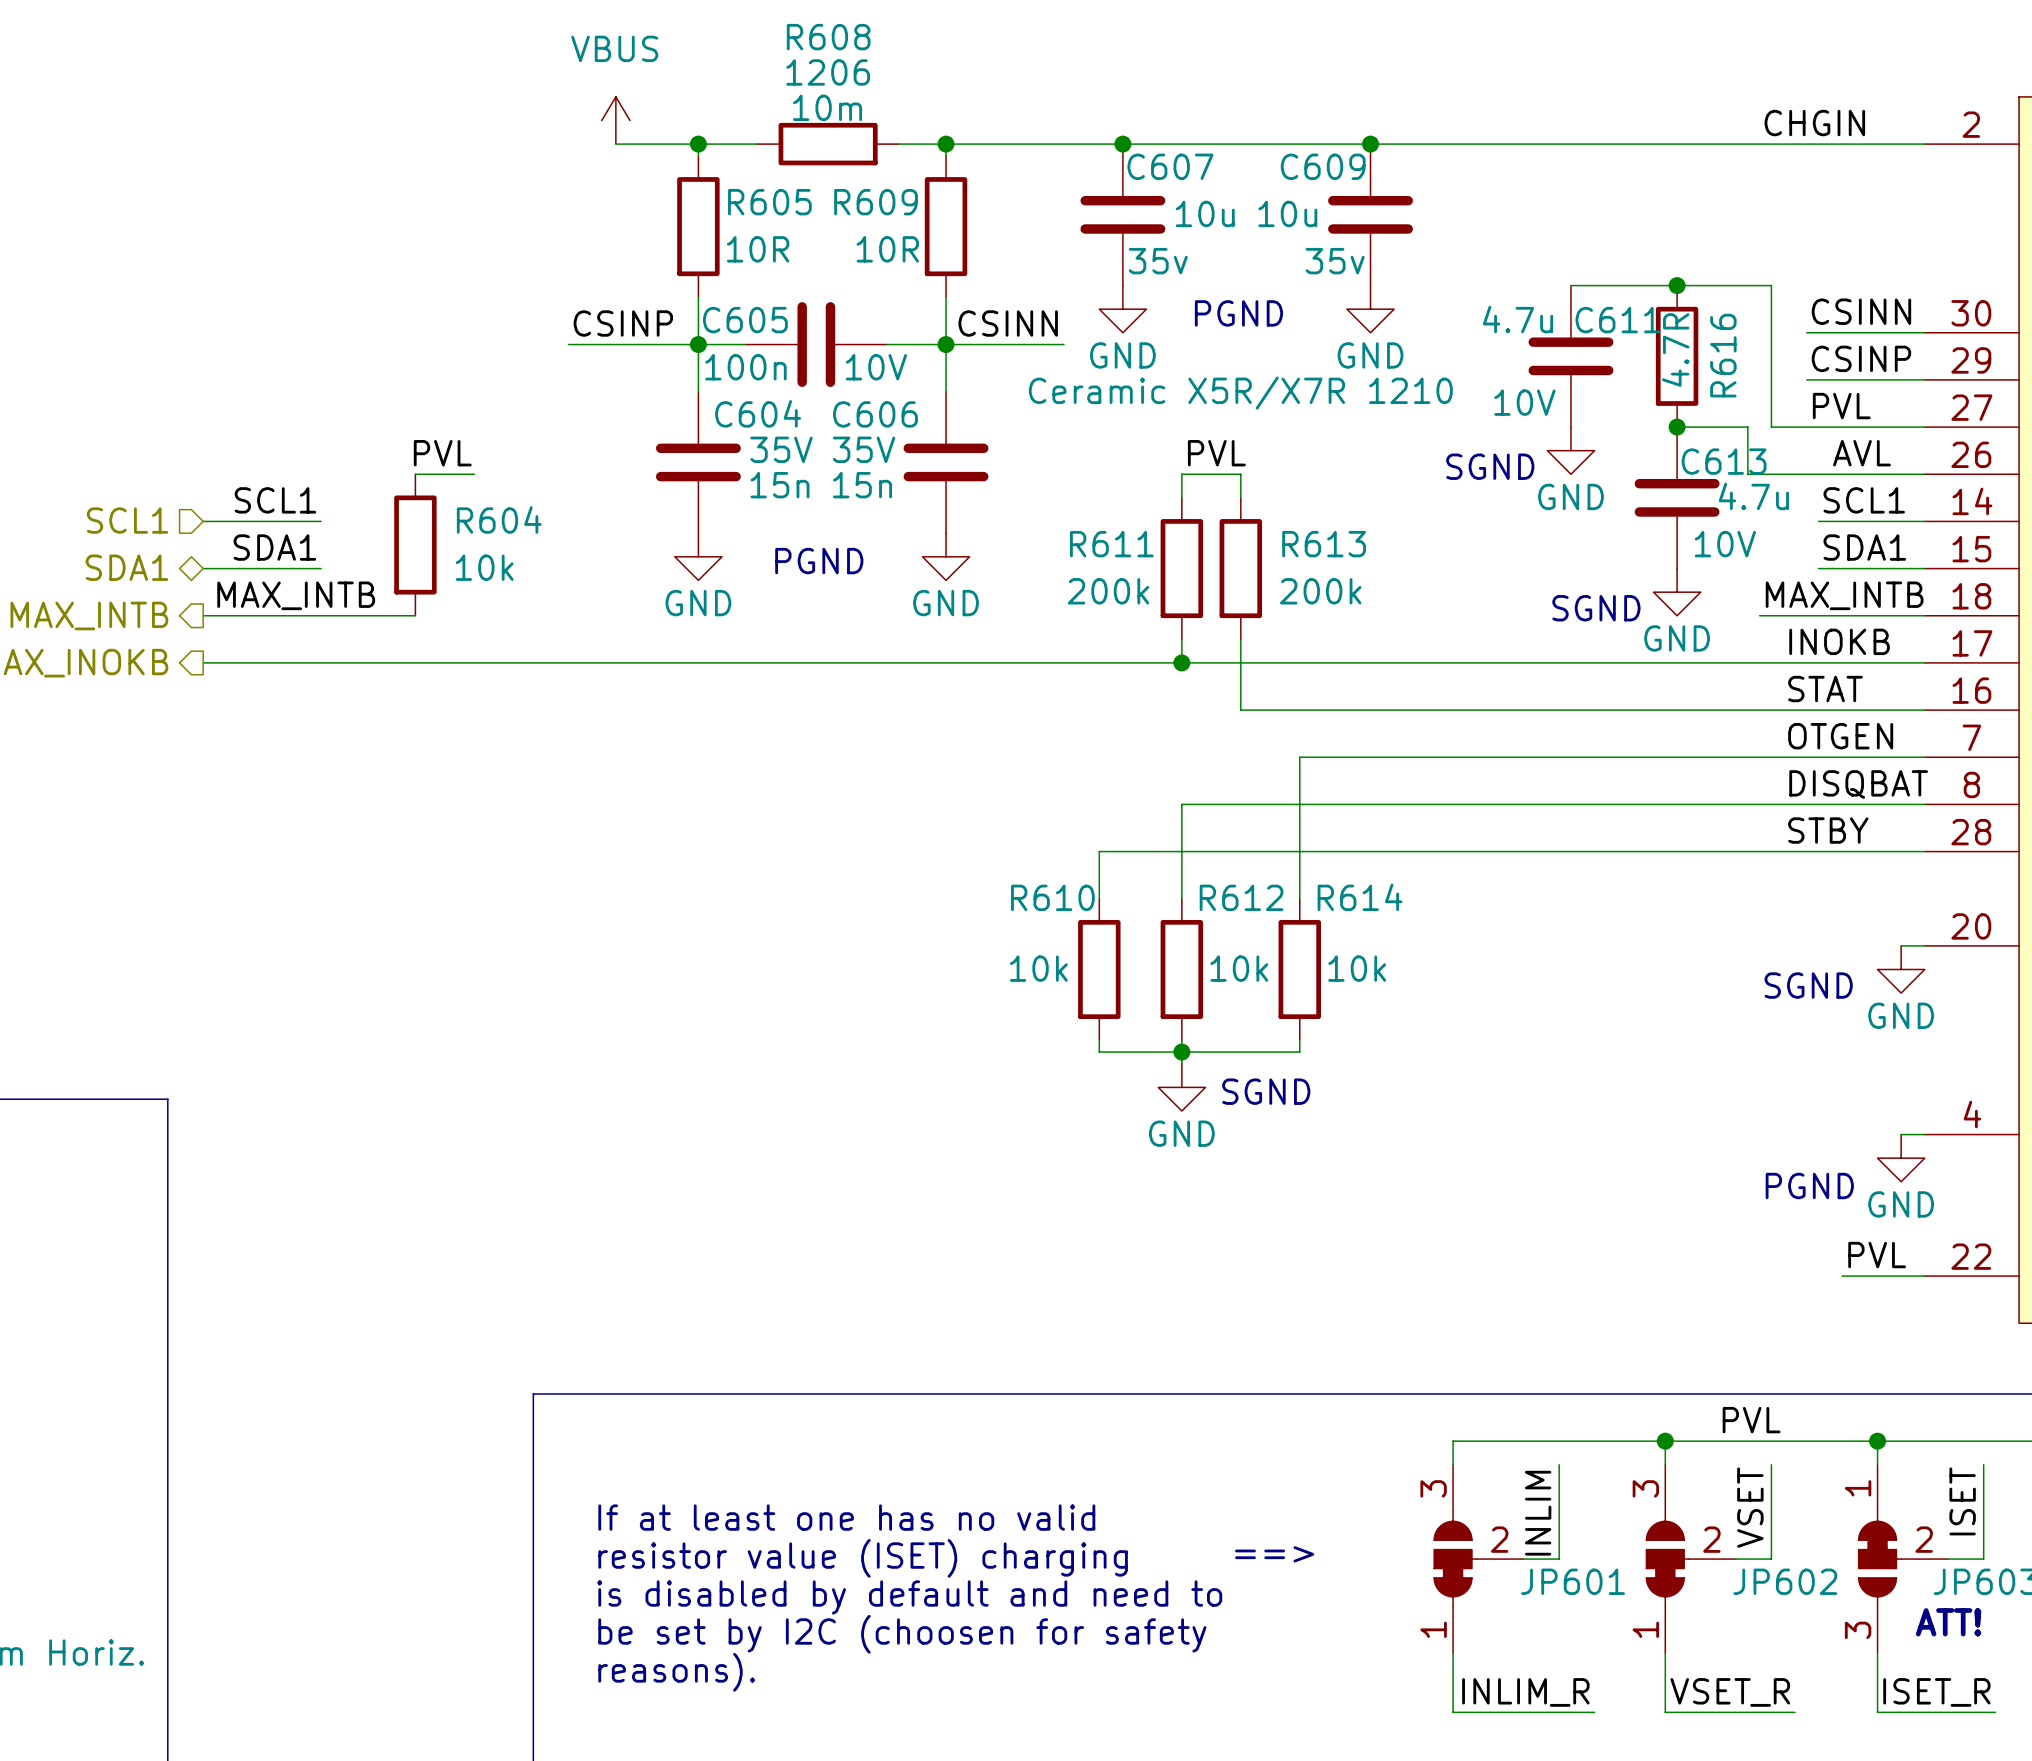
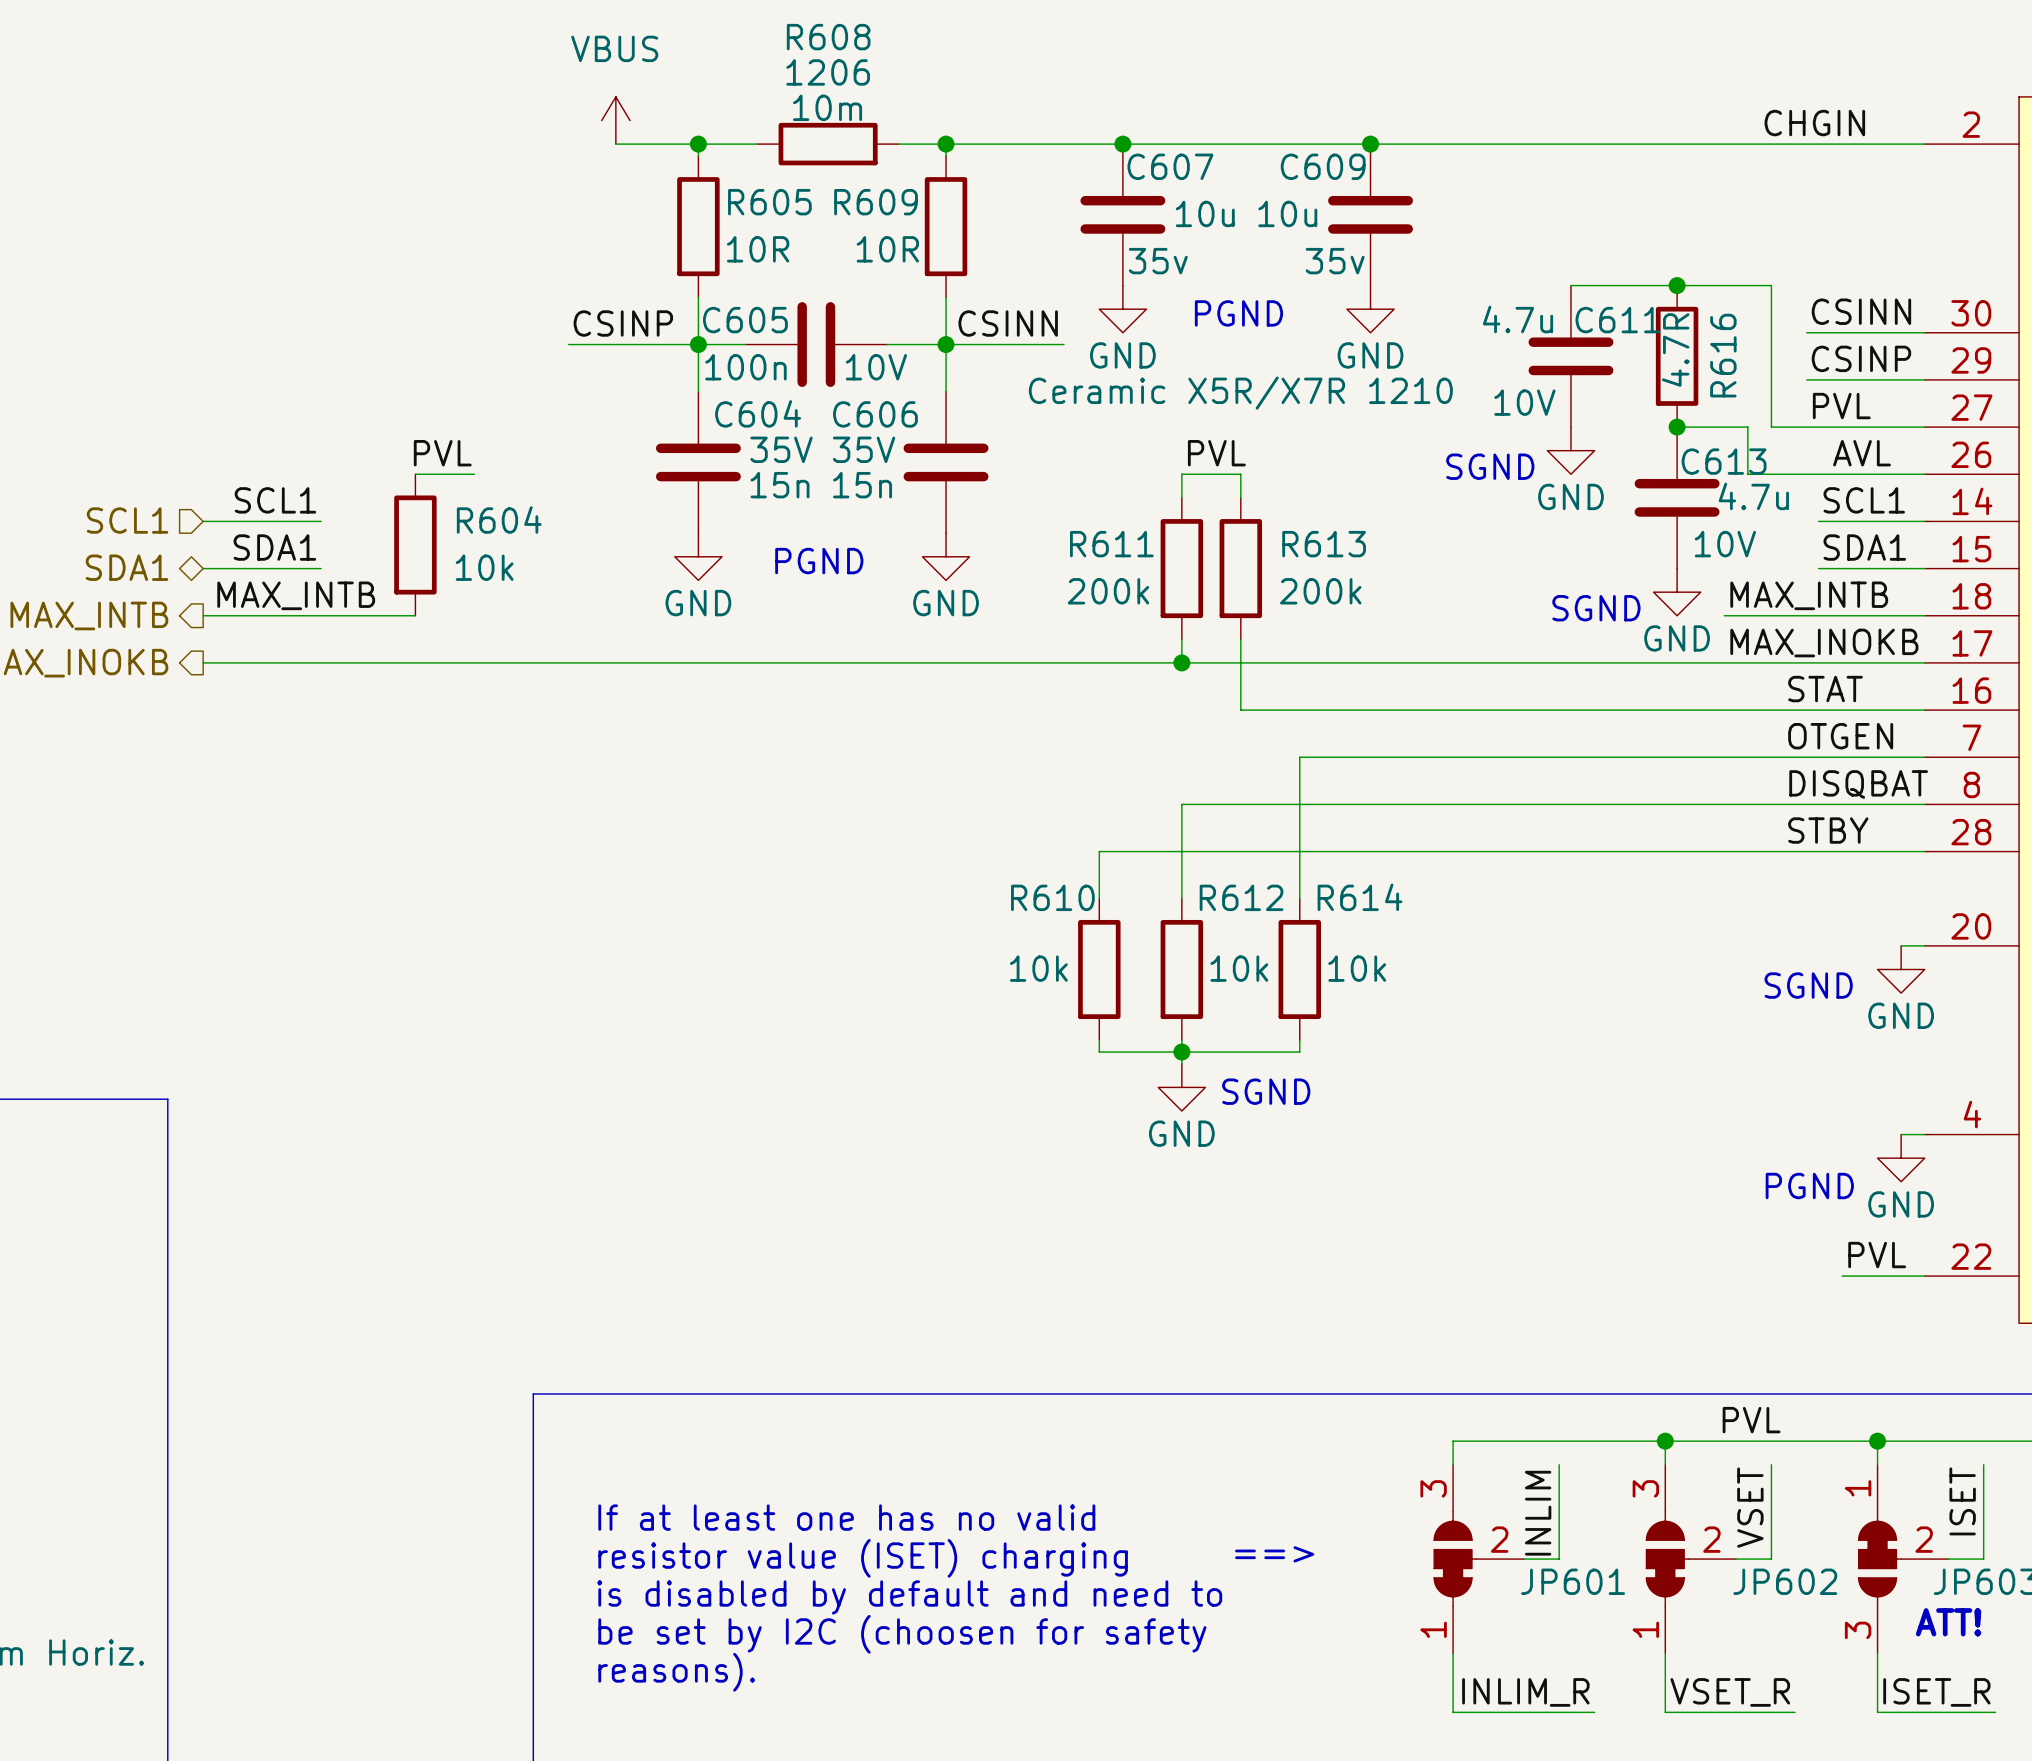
label position: MAX_INTB (1844, 595) -> MAX_INTB (1809, 595)
wire: none -> (1724, 615) (1759, 615)
label: INOKB (1839, 641) -> MAX_INOKB (1824, 642)

